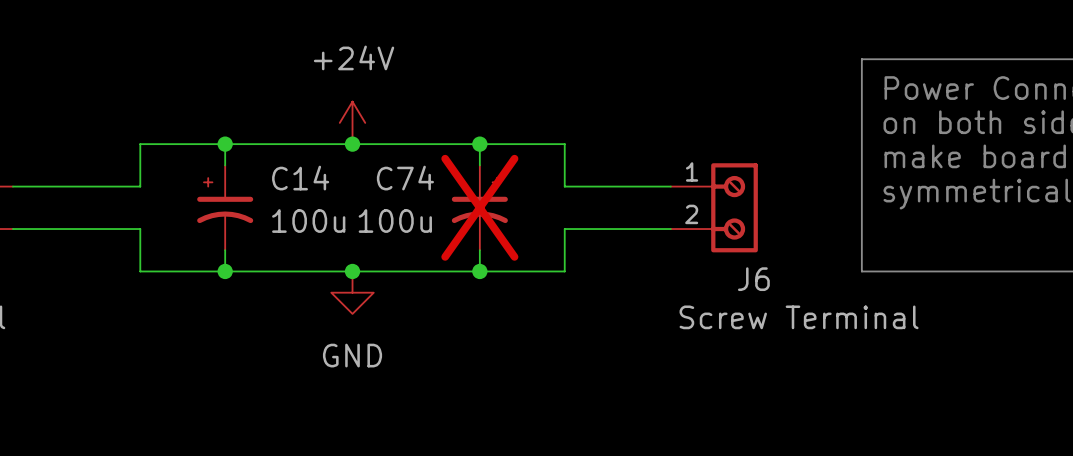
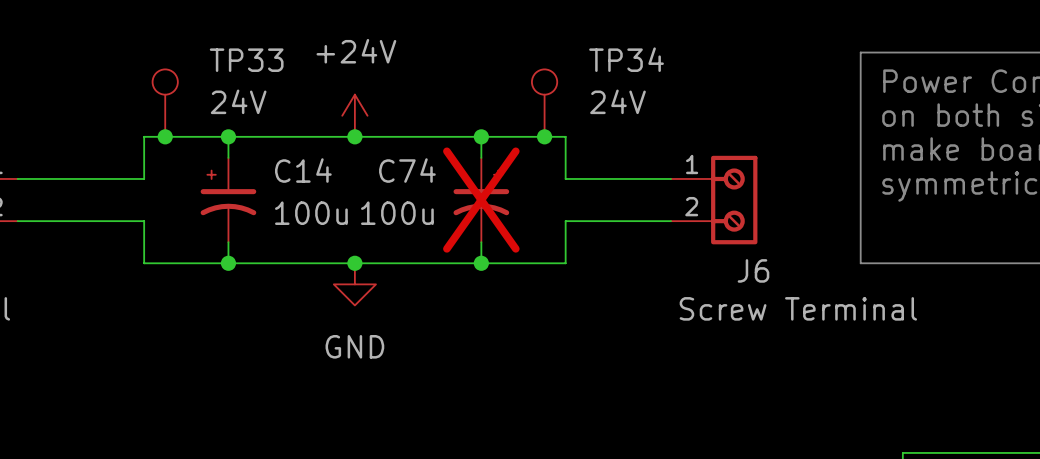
TP33: none -> 24V (165, 103)
TP34: none -> 24V (544, 103)
junction: none -> (165, 136)
junction: none -> (544, 136)

